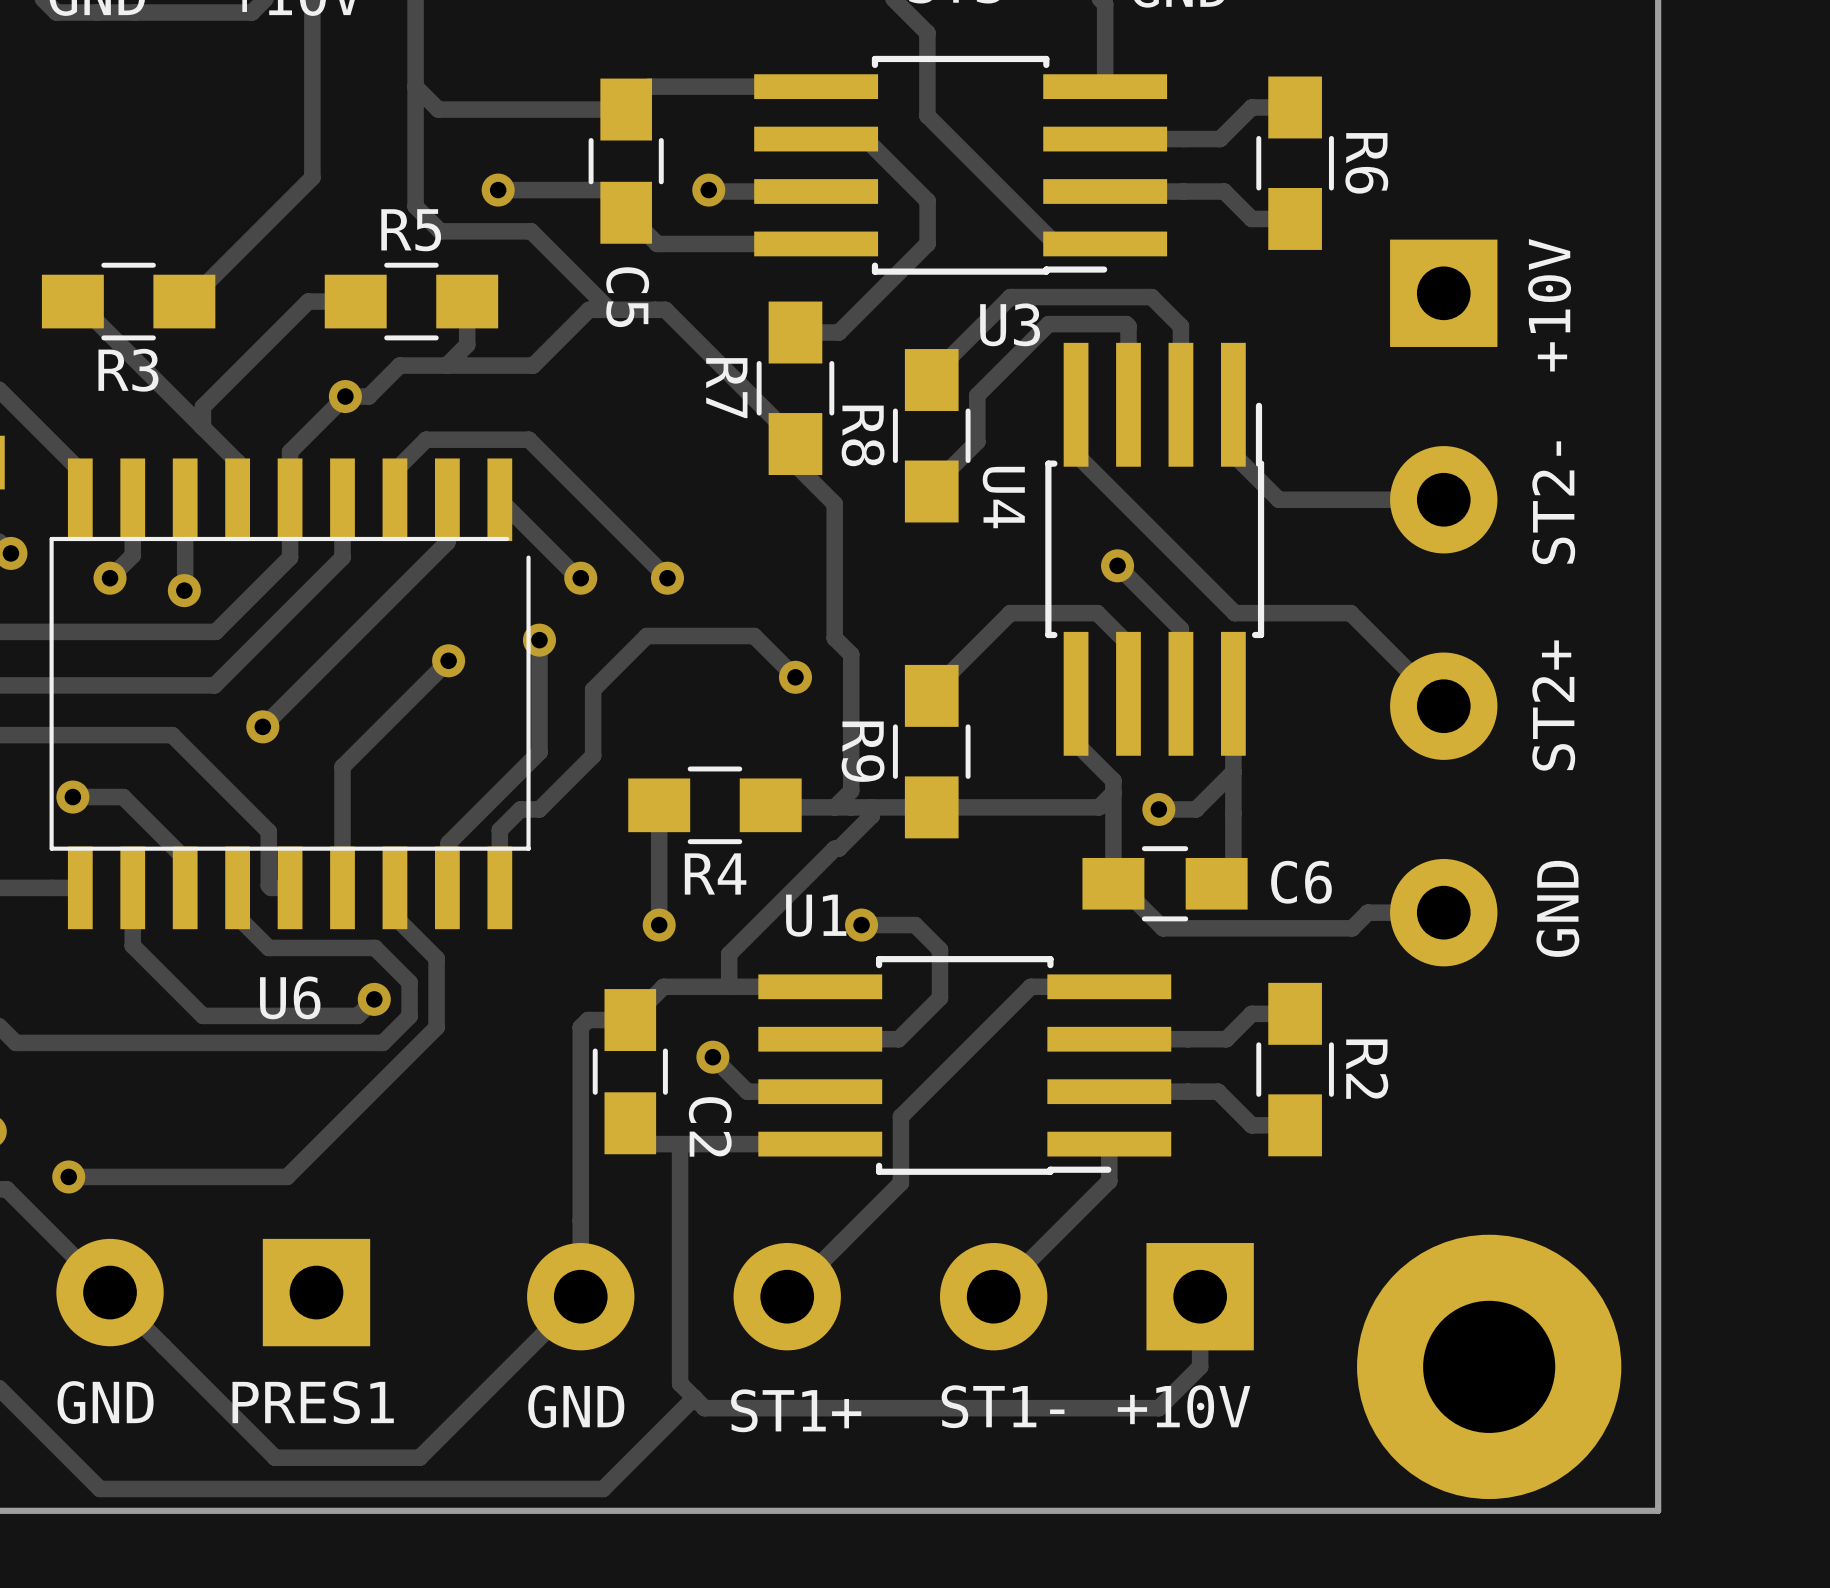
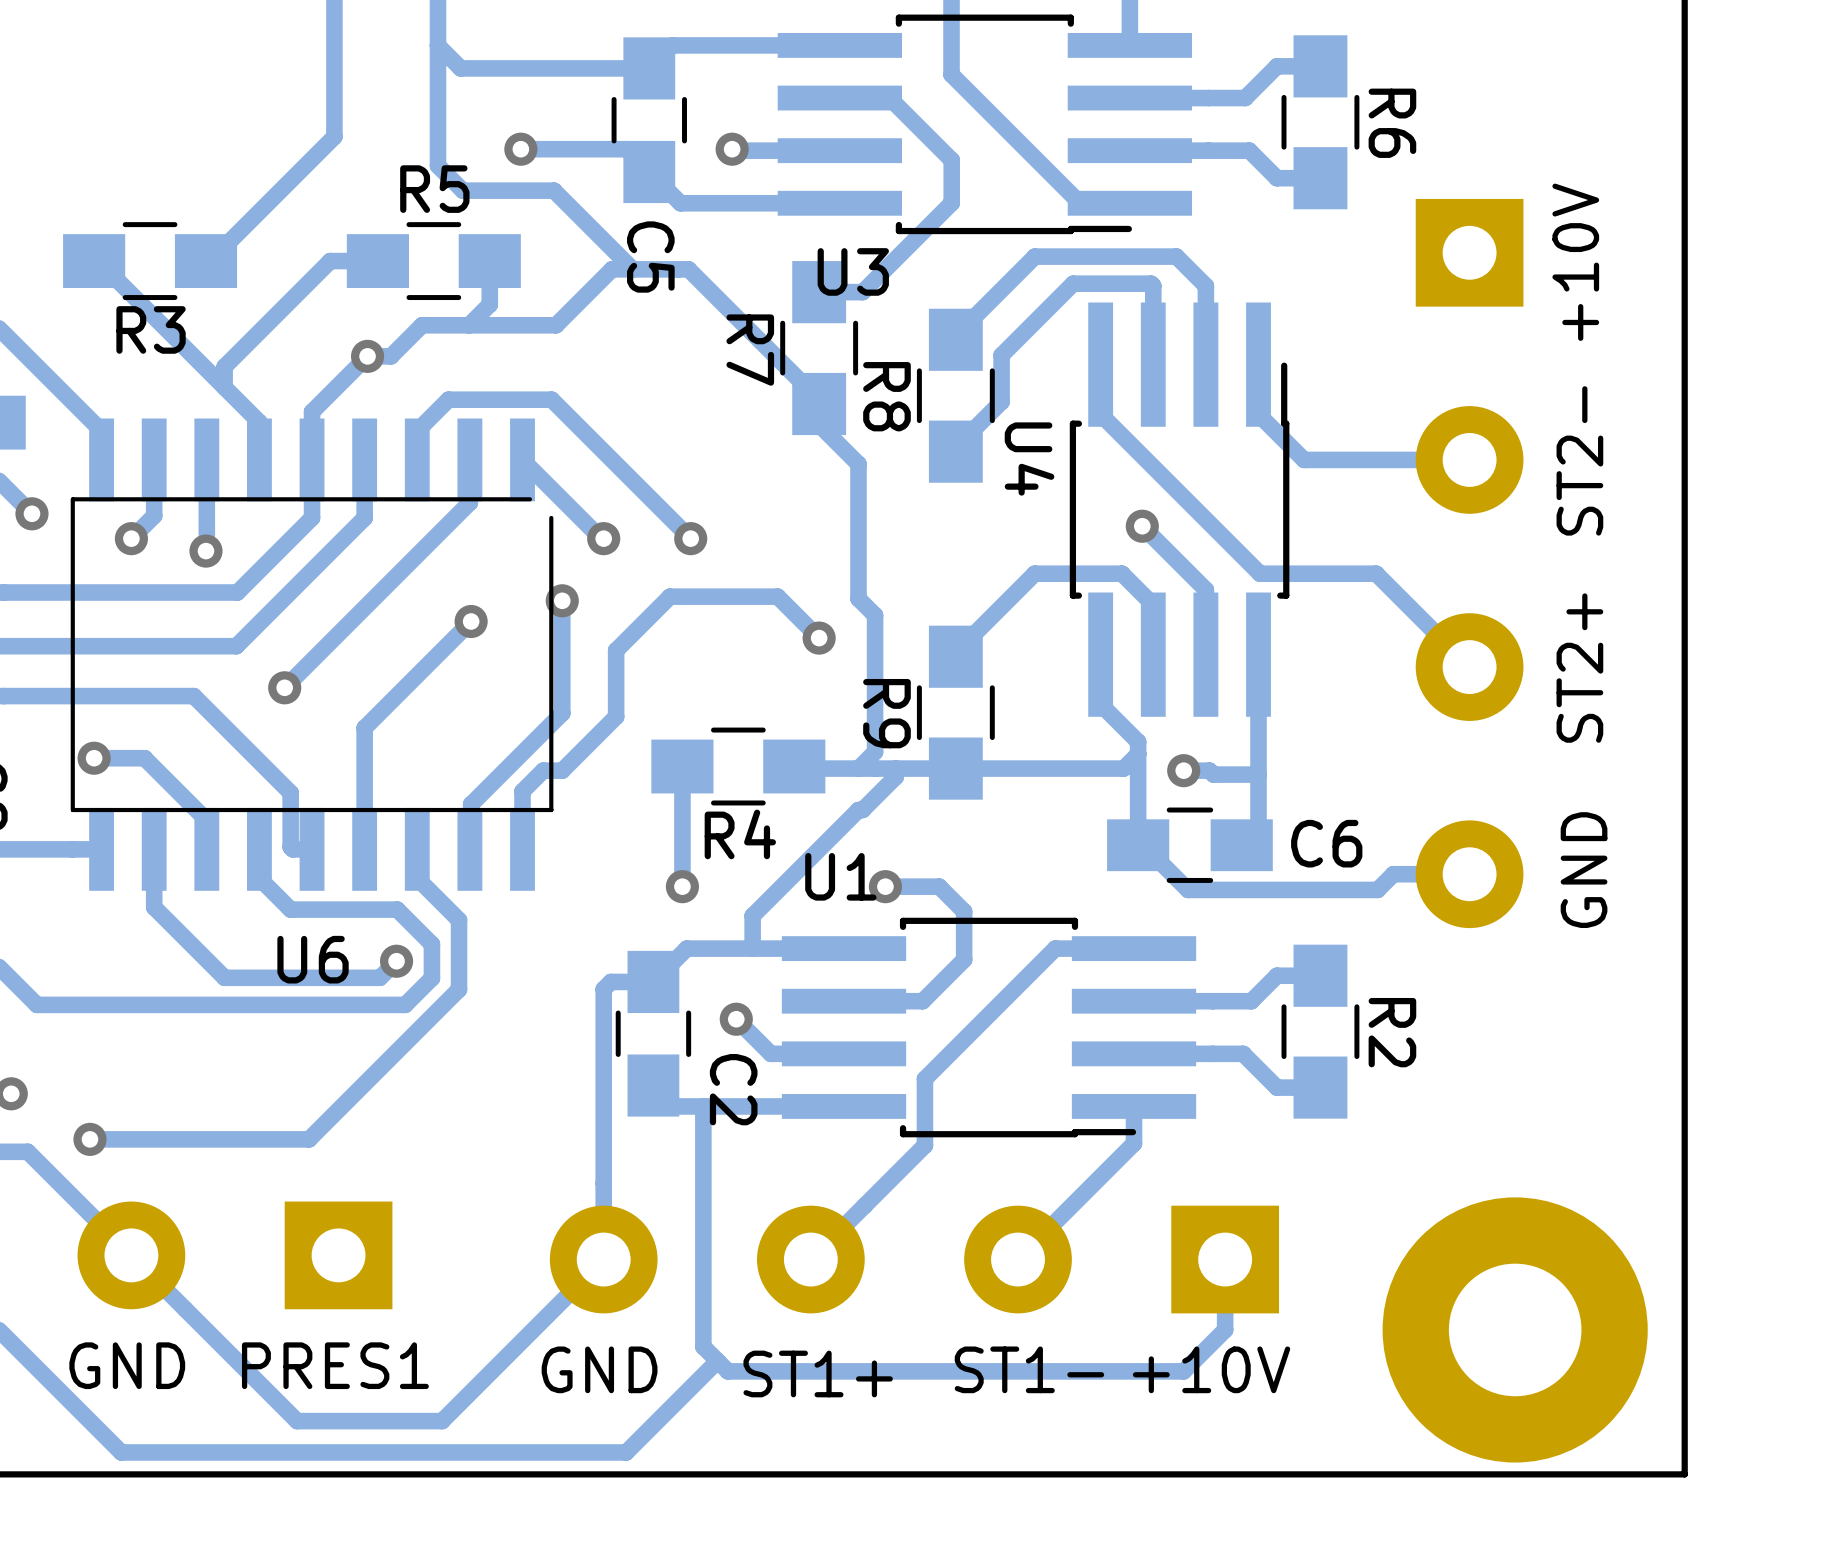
U3 name position: U3 (1010, 324) -> U3 (853, 271)
track: (1233, 772) (1196, 809) (1184, 809) -> (1258, 774) (1213, 774) (1209, 770)

